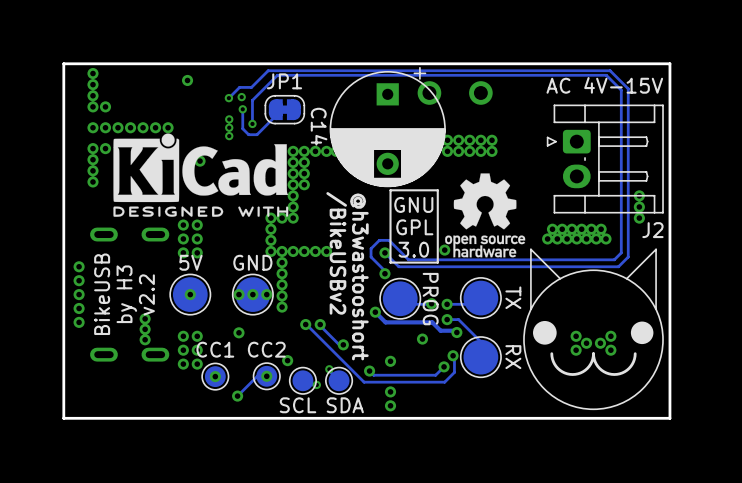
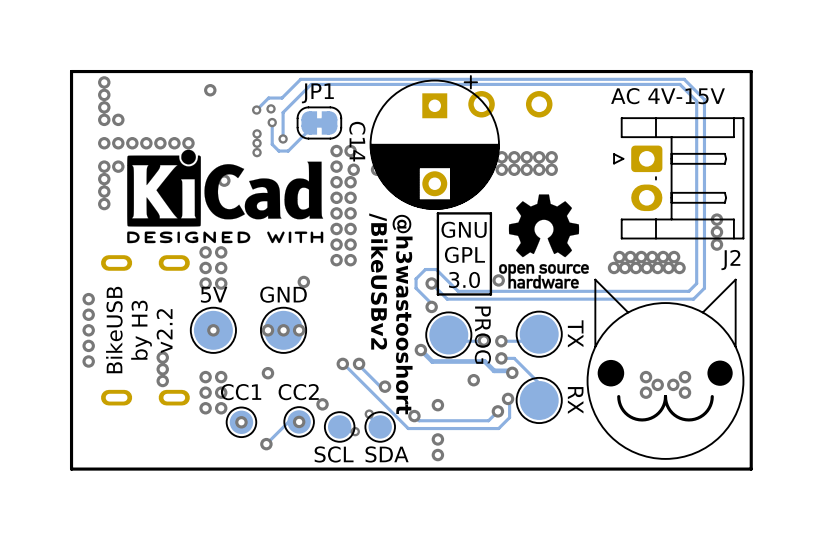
via: none -> (336, 151)
via: none -> (350, 151)
via: none -> (336, 166)
via: (293, 151) -> none
via: (304, 151) -> none
via: (326, 151) -> none
via: (293, 162) -> none
via: none -> (336, 182)
via: (304, 162) -> none
via: none -> (350, 182)
via: (293, 173) -> none
via: (304, 173) -> none
via: none -> (336, 197)
via: none -> (350, 197)
via: (293, 184) -> none
via: (304, 184) -> none
via: none -> (336, 213)
via: none -> (350, 213)
via: (293, 195) -> none
via: none -> (336, 228)
via: none -> (350, 228)
via: (293, 206) -> none
via: (270, 218) -> none
via: (282, 218) -> none
via: (293, 218) -> none
via: none -> (336, 244)
via: none -> (350, 244)
via: (270, 229) -> none
via: none -> (336, 260)
via: none -> (350, 260)
via: (270, 240) -> none
via: (282, 251) -> none
via: (293, 251) -> none
via: (304, 251) -> none
via: (315, 251) -> none
via: (326, 251) -> none
via: (282, 262) -> none
via: (282, 273) -> none
via: (282, 284) -> none
via: (282, 295) -> none
via: (282, 307) -> none

